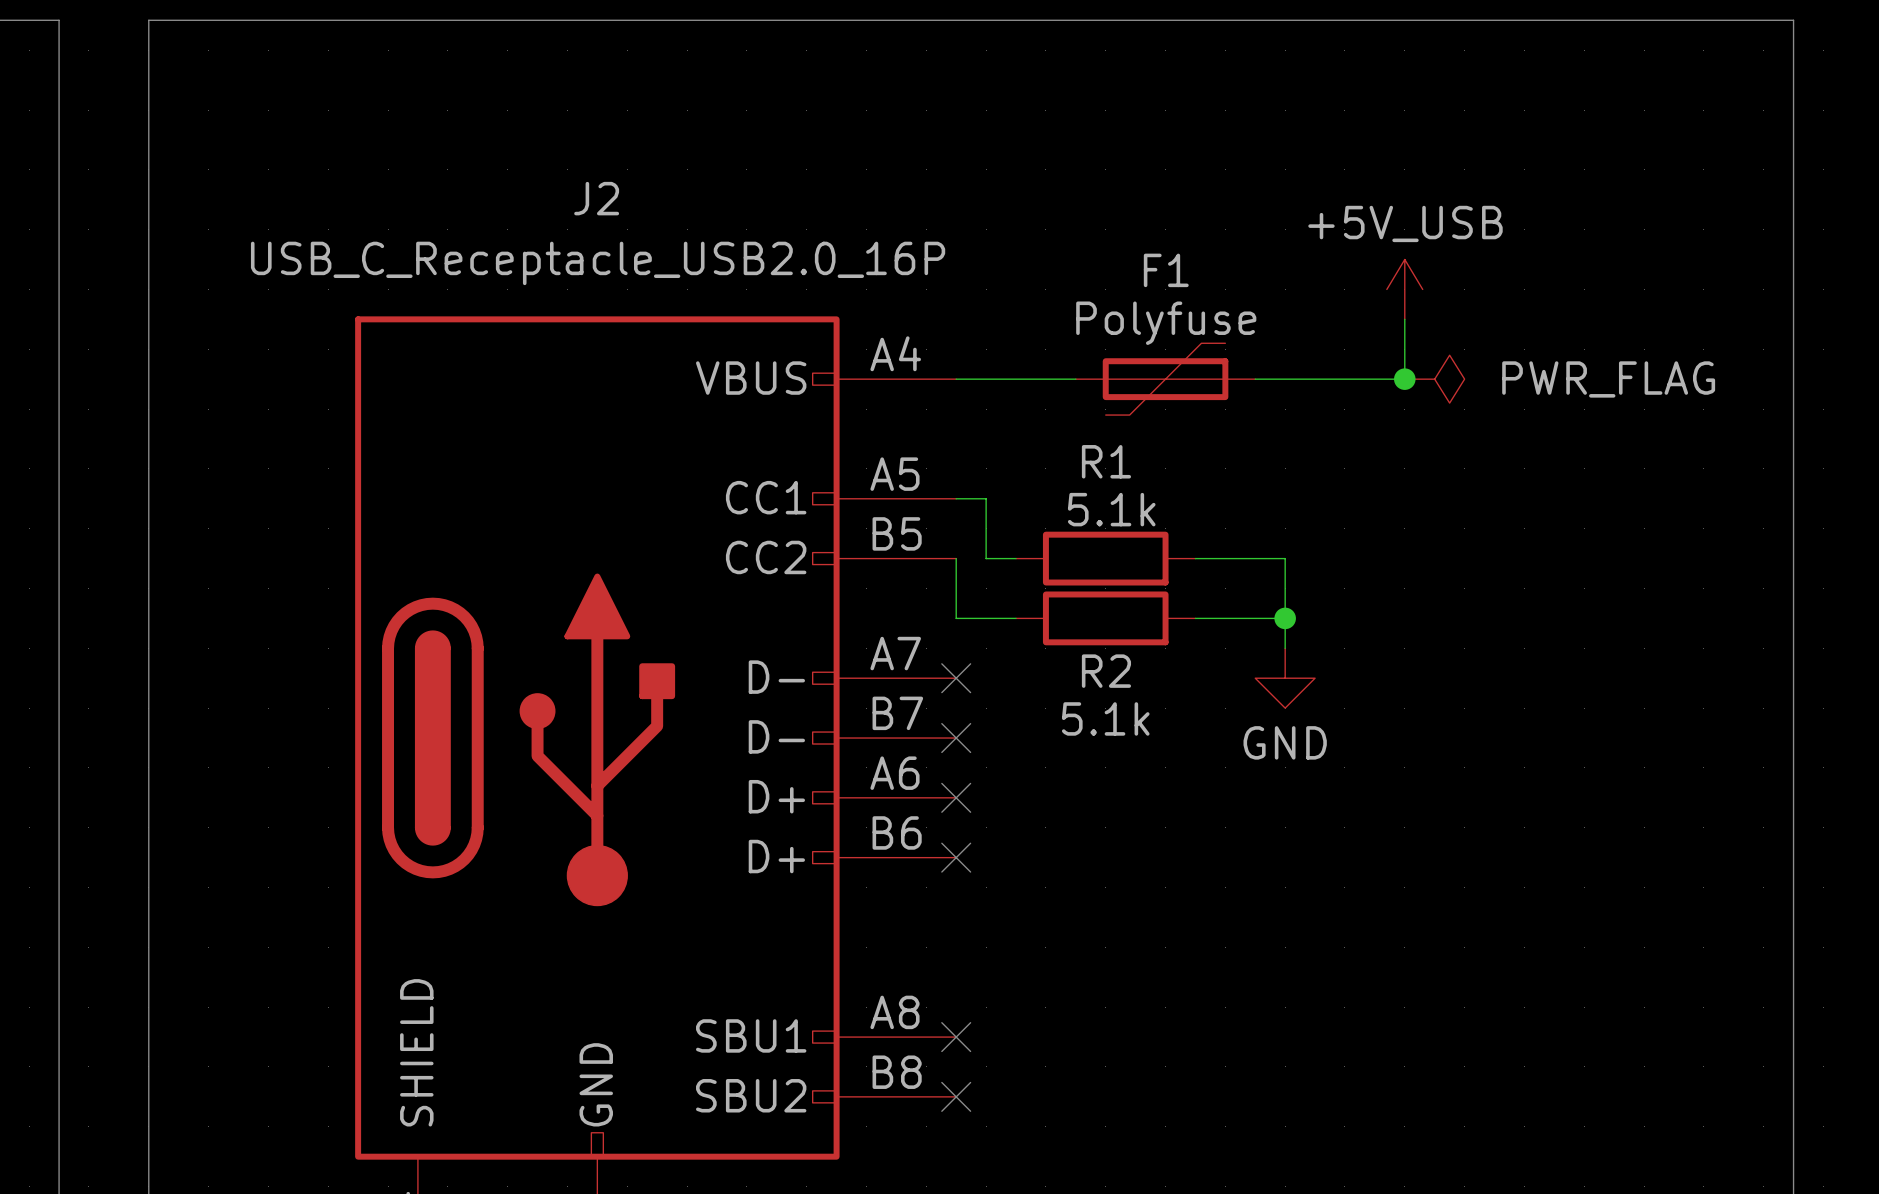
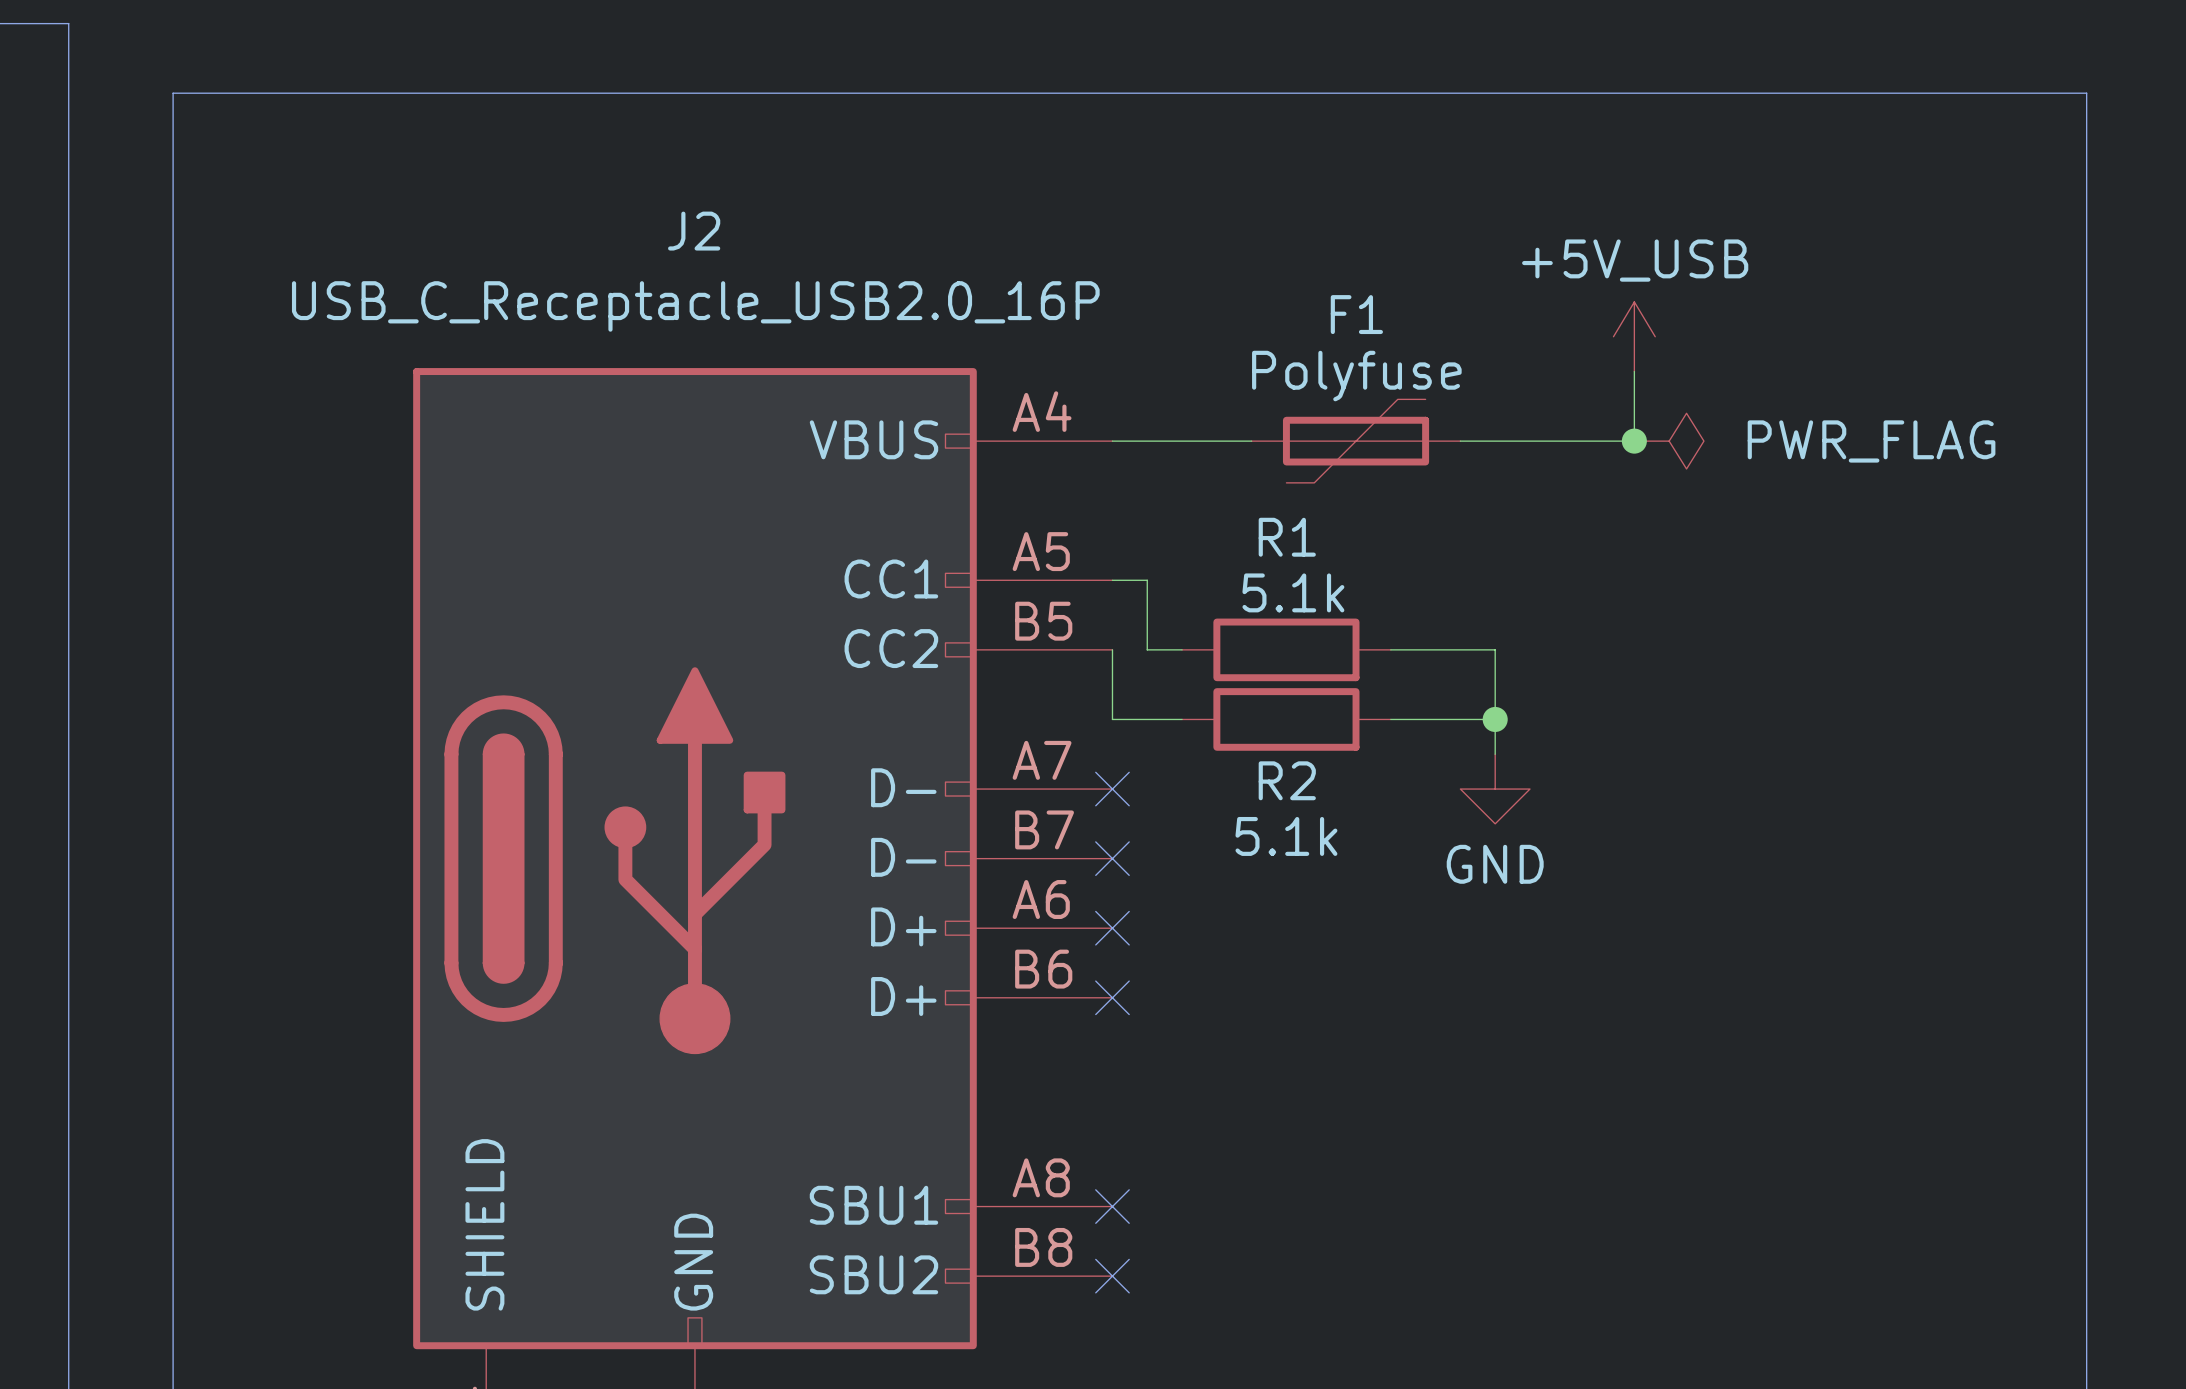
line: (148, 80) (148, 20) (1793, 20) (1793, 80) -> (173, 93) (2086, 93)

